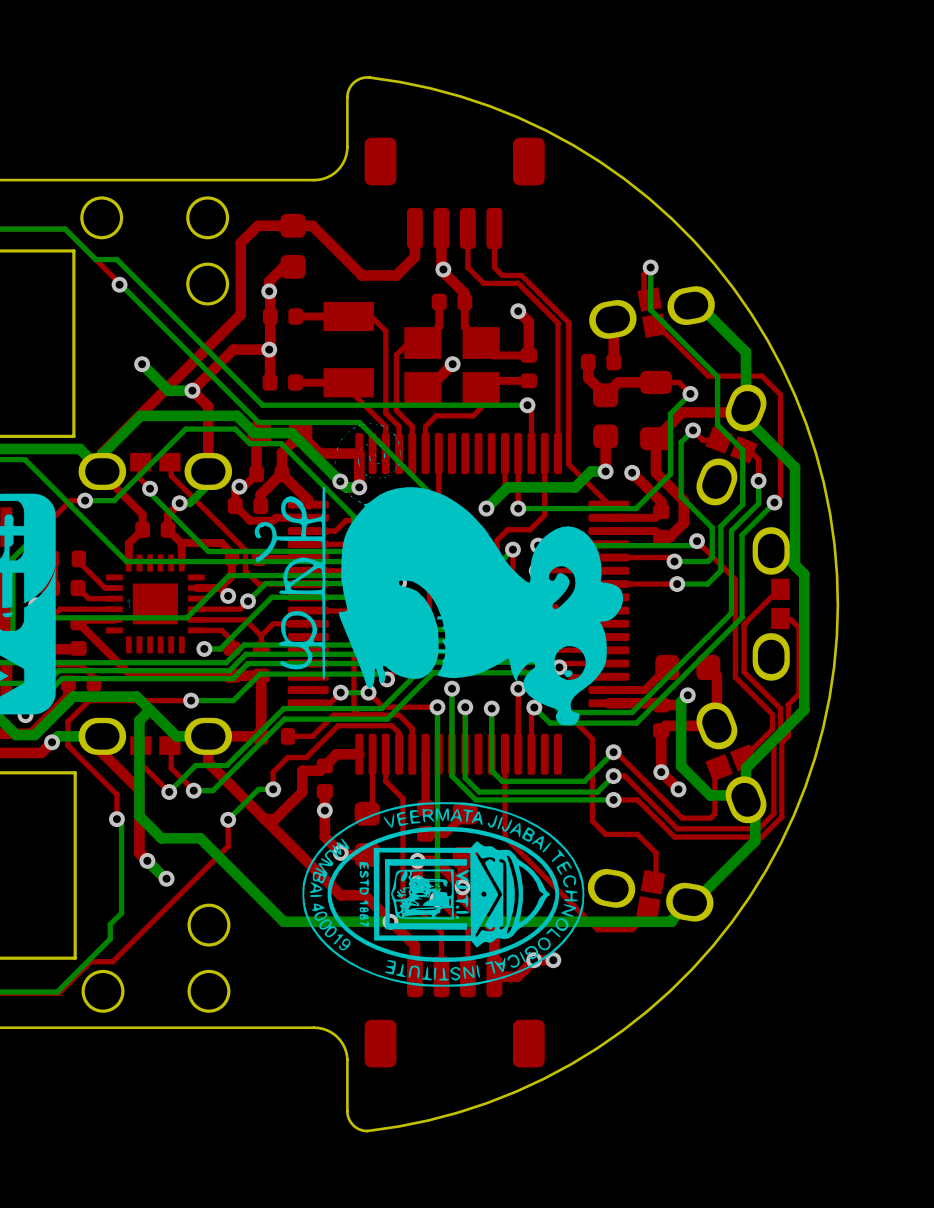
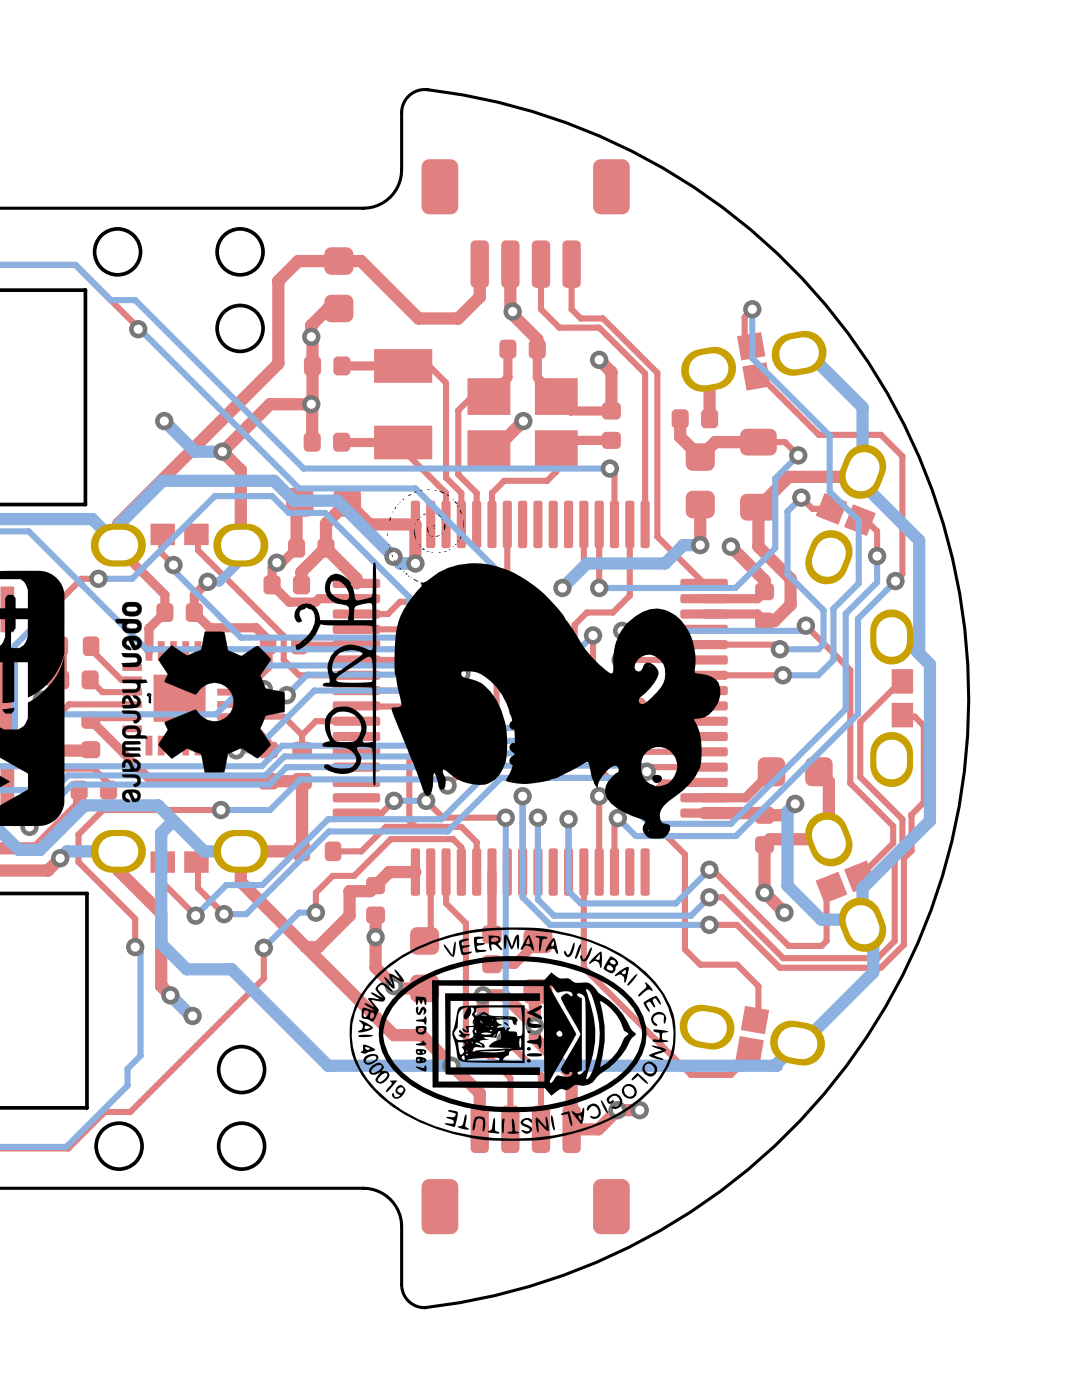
drawing: none -> [115, 601, 285, 803]

